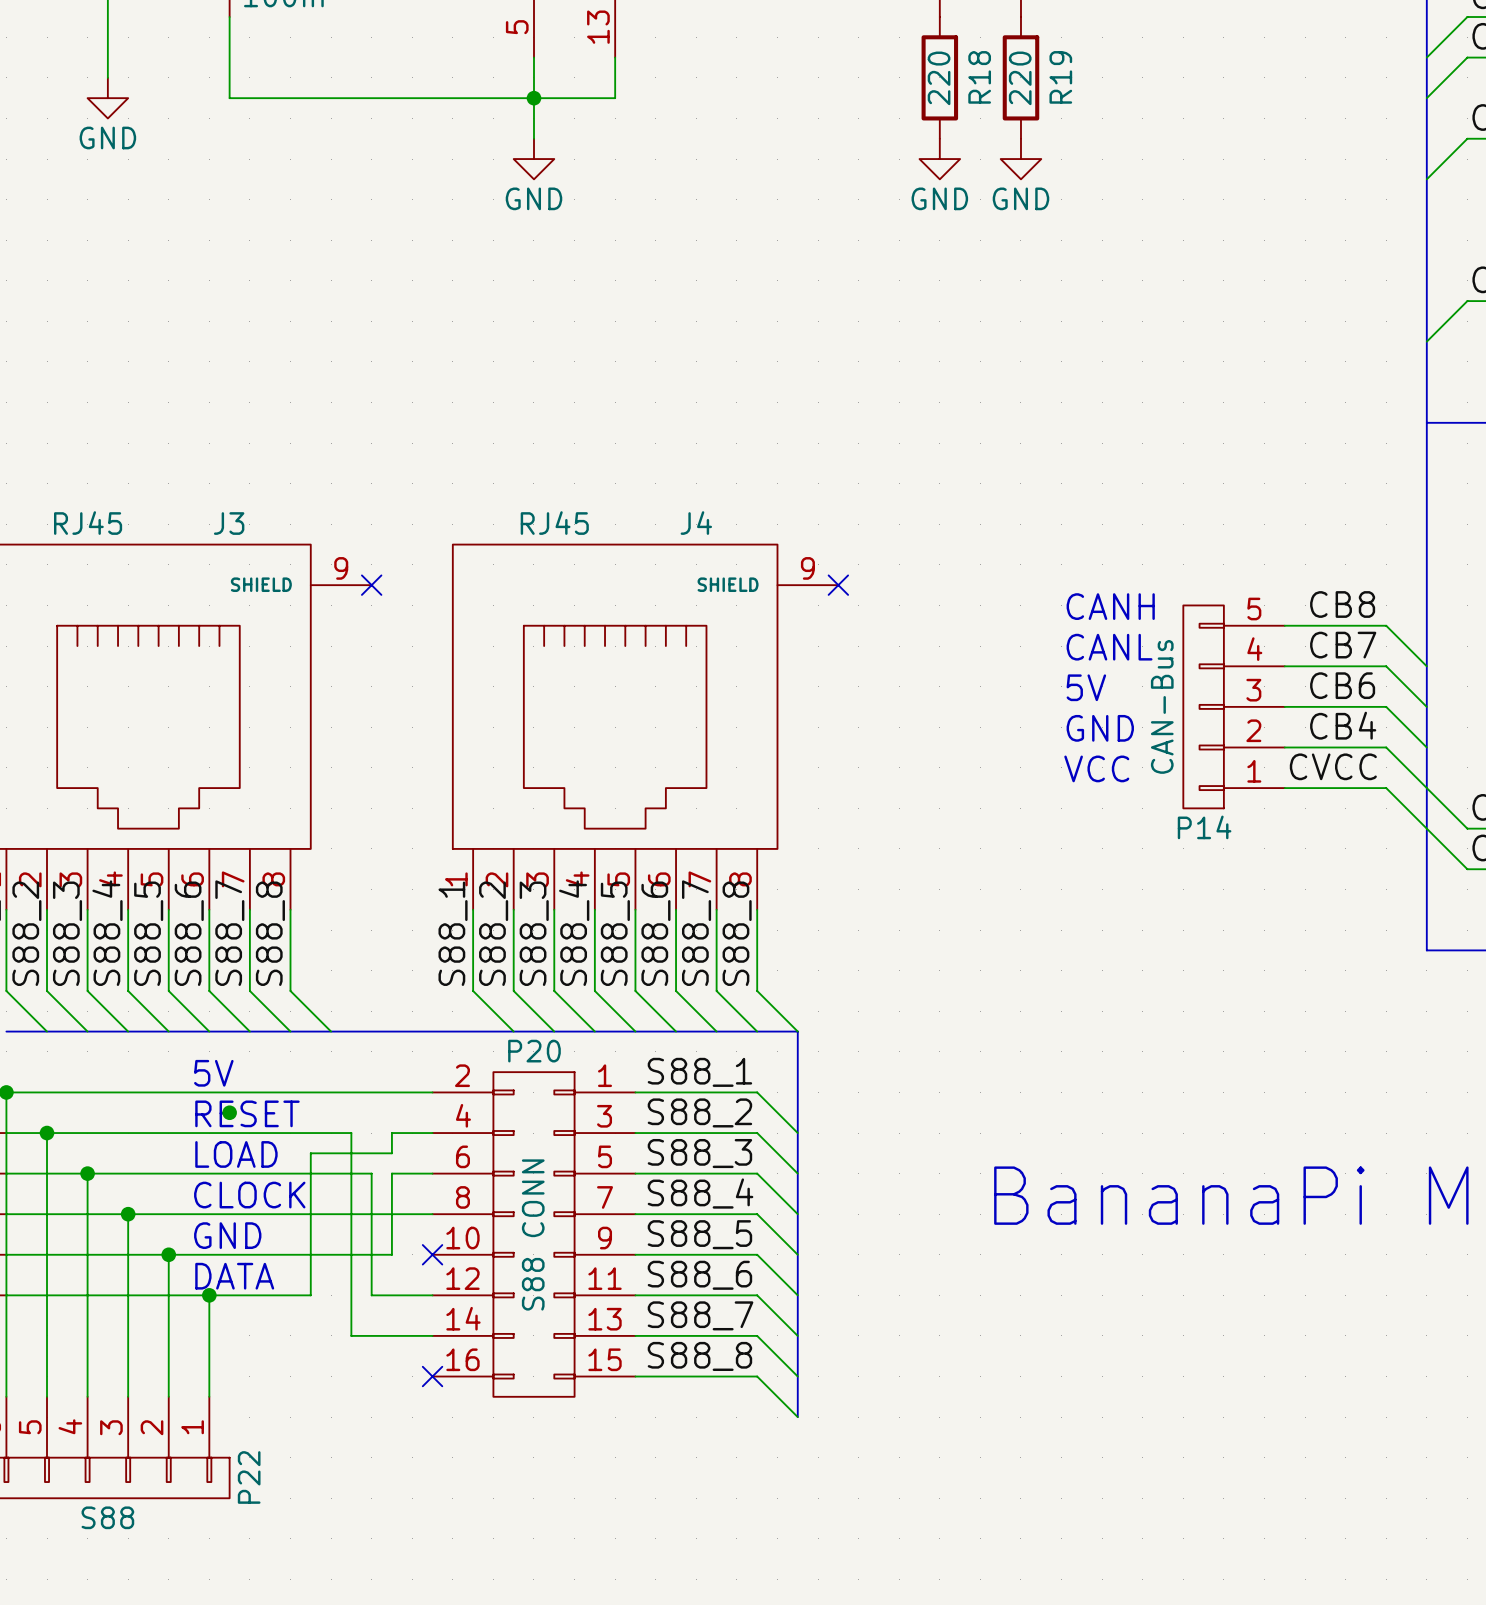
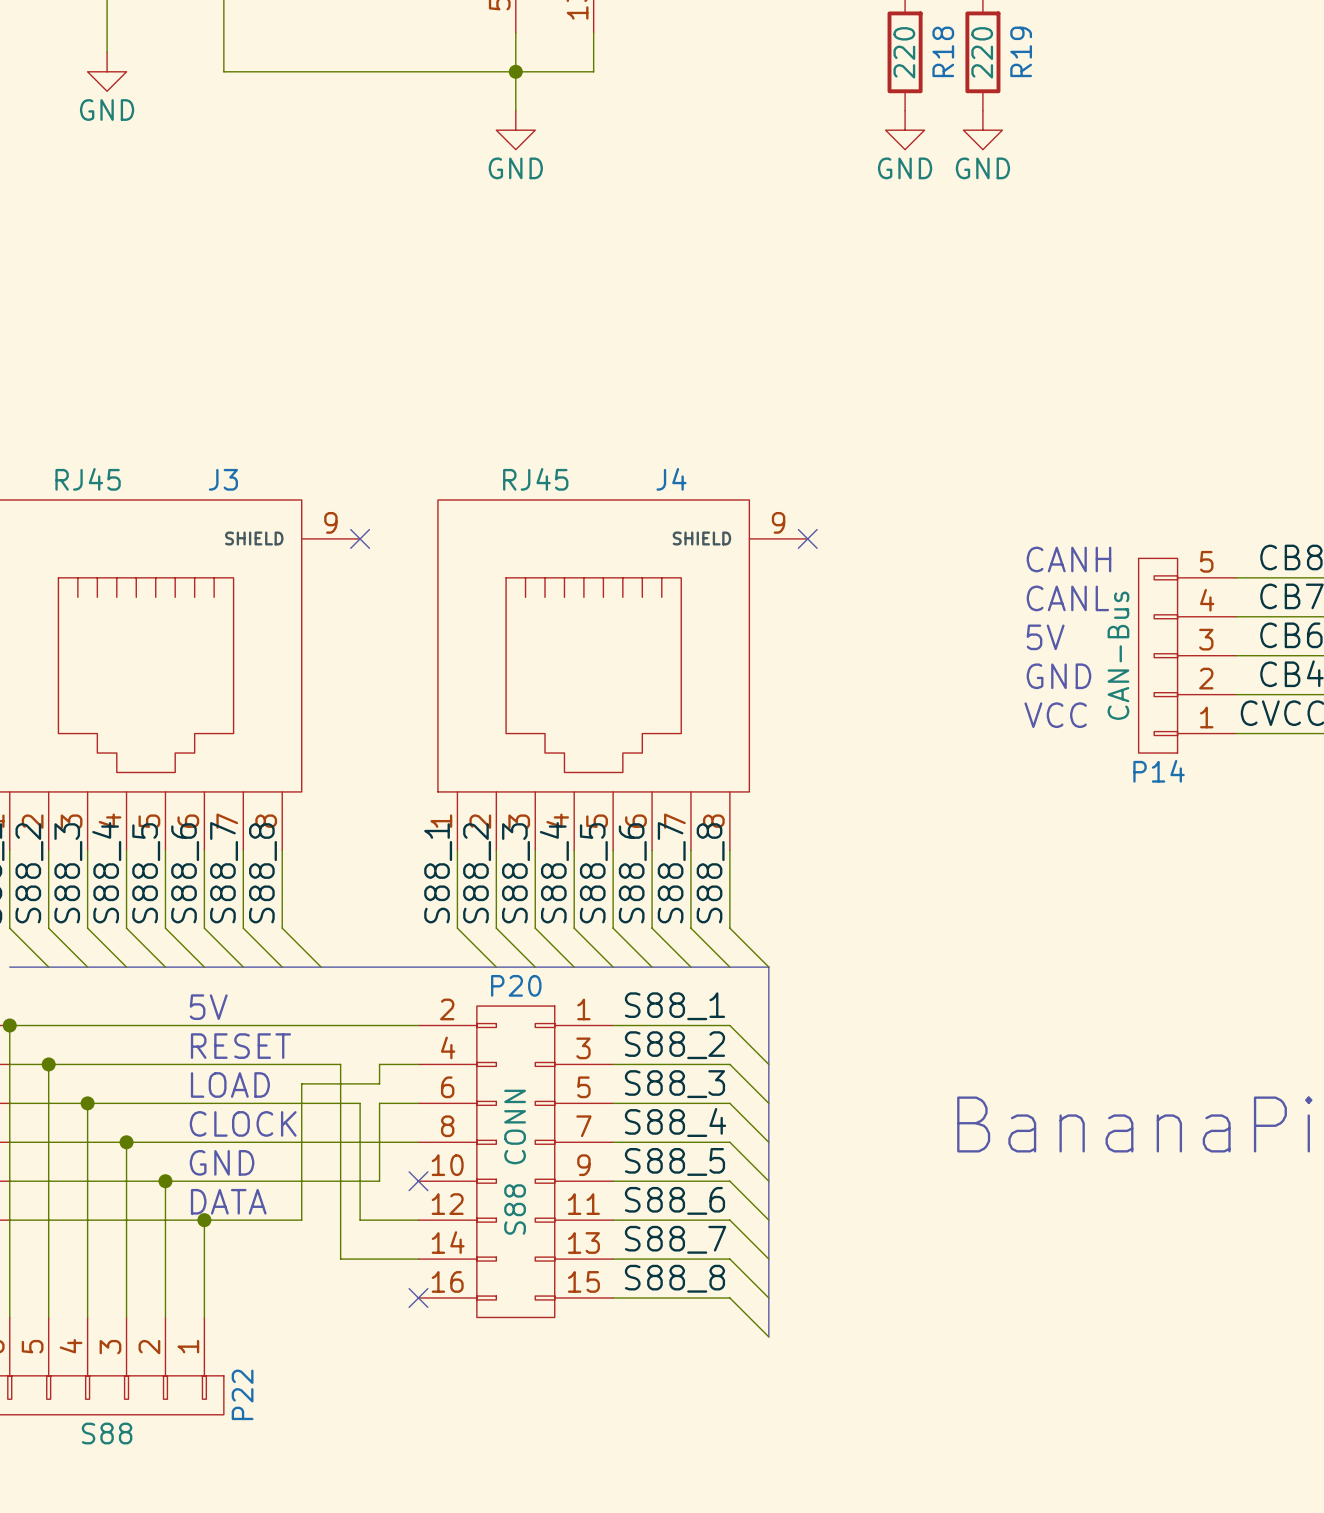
junction: (229, 1112) -> none

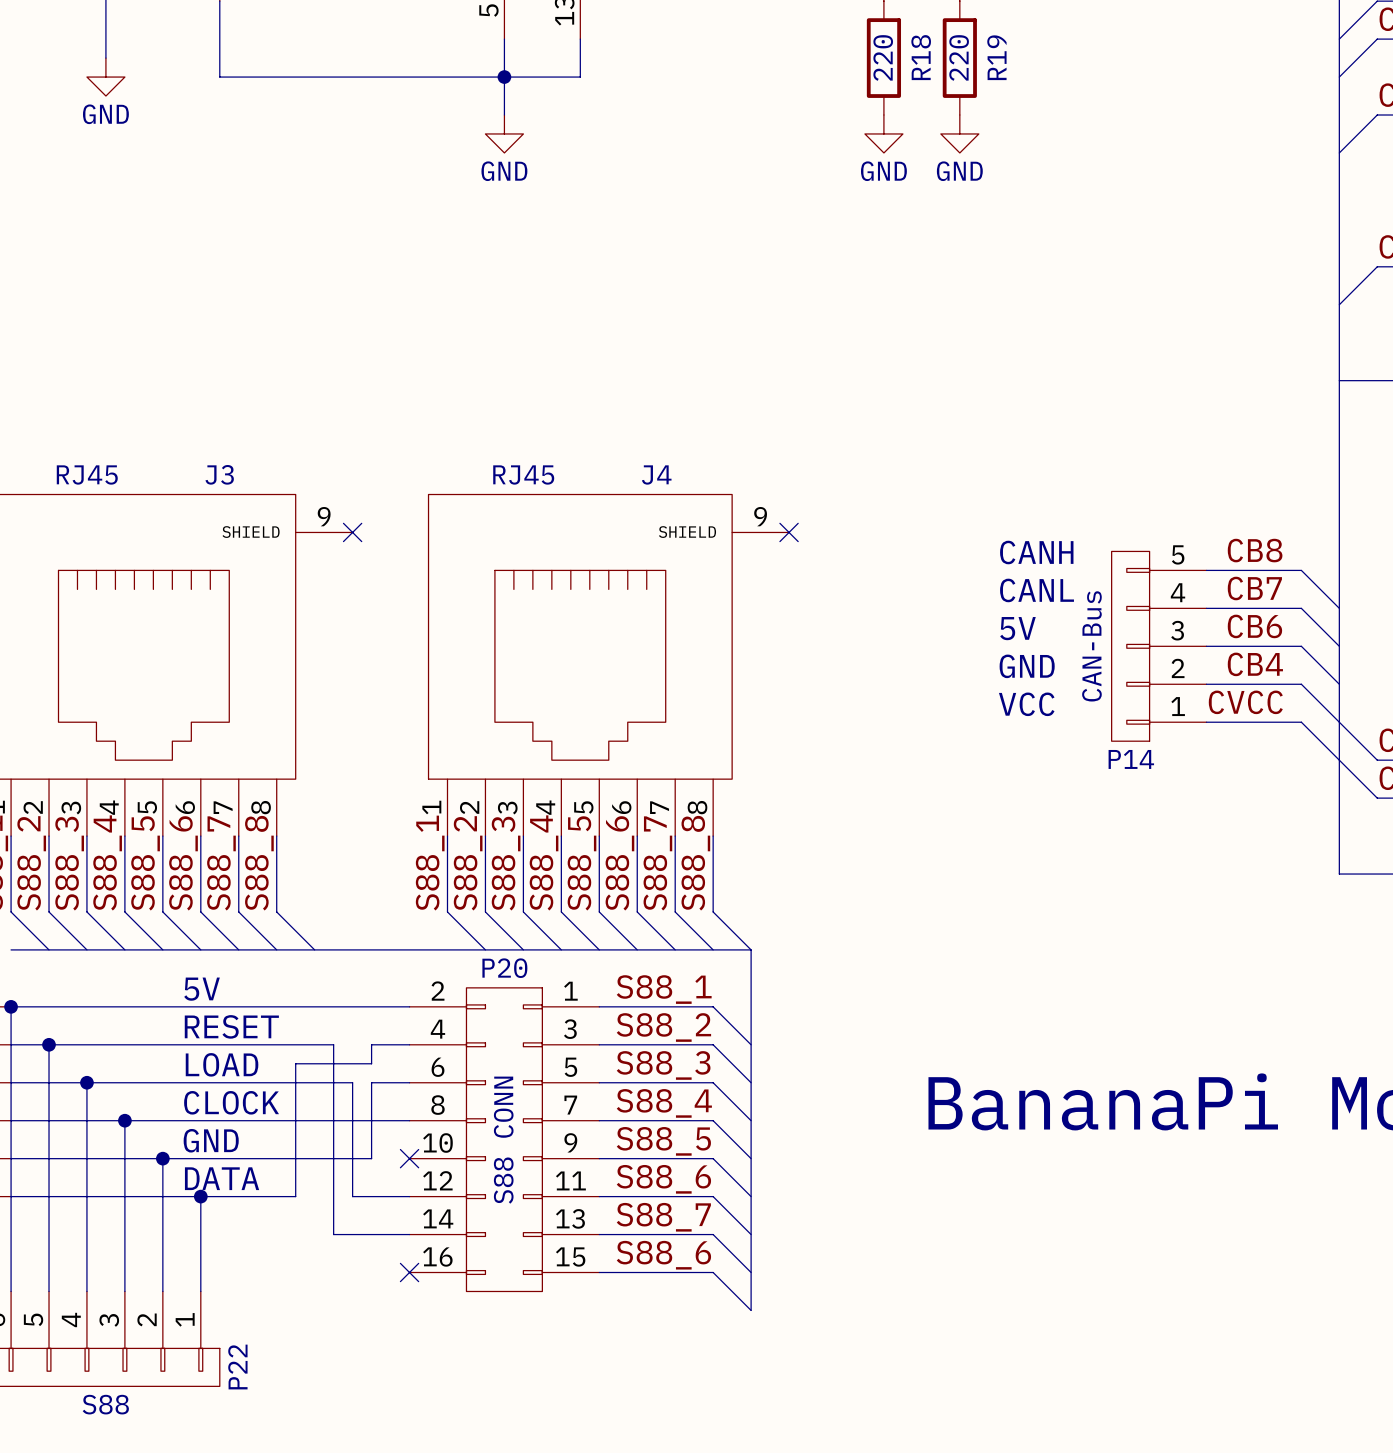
label: S88_8 (674, 1278) -> S88_6 (663, 1255)

